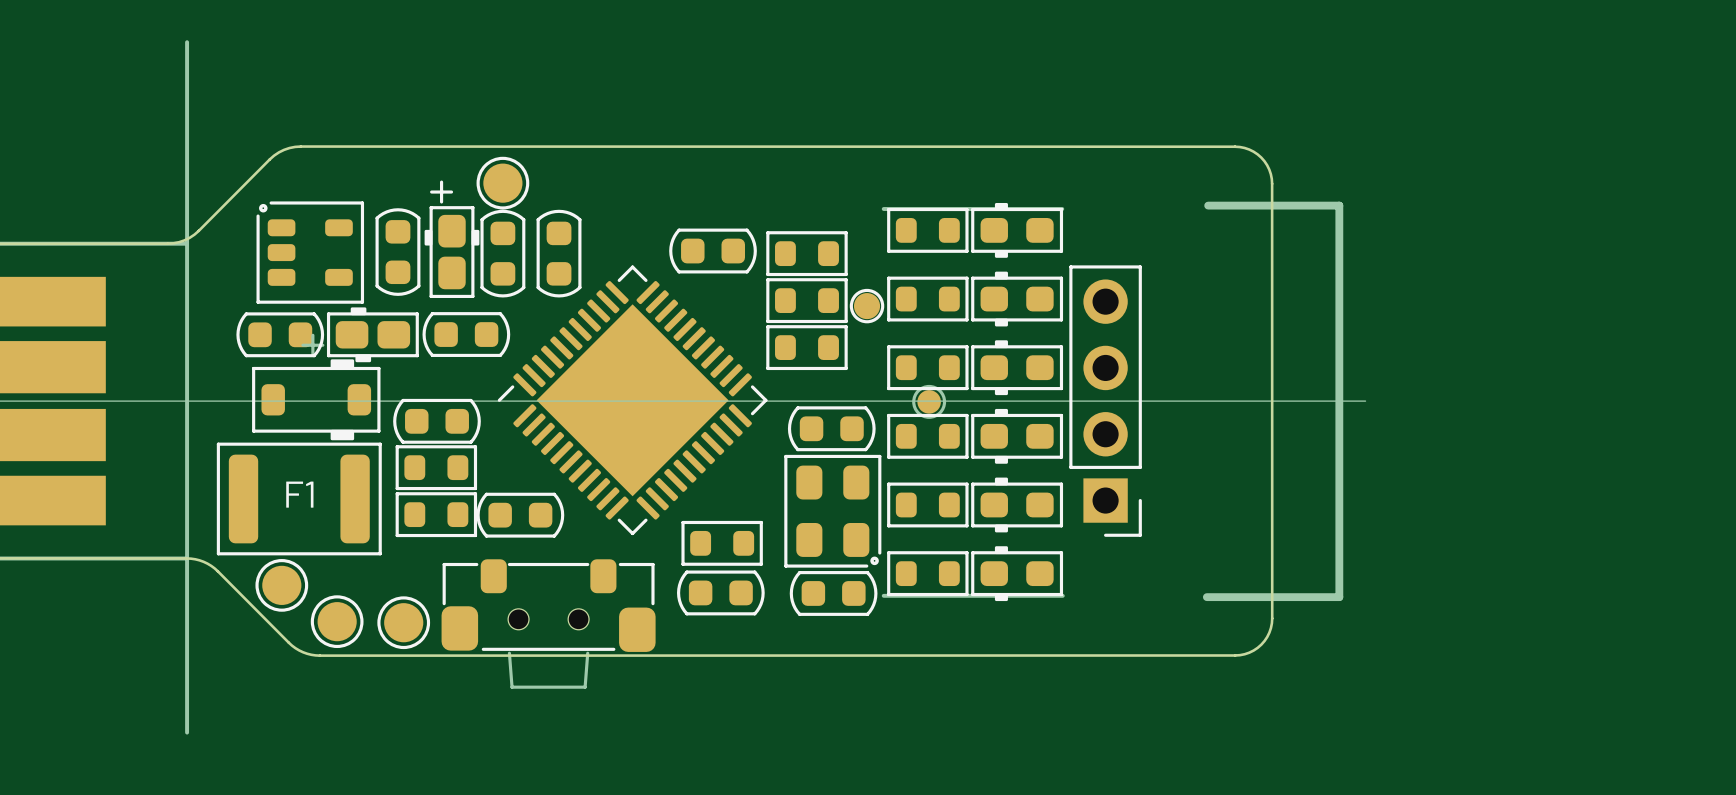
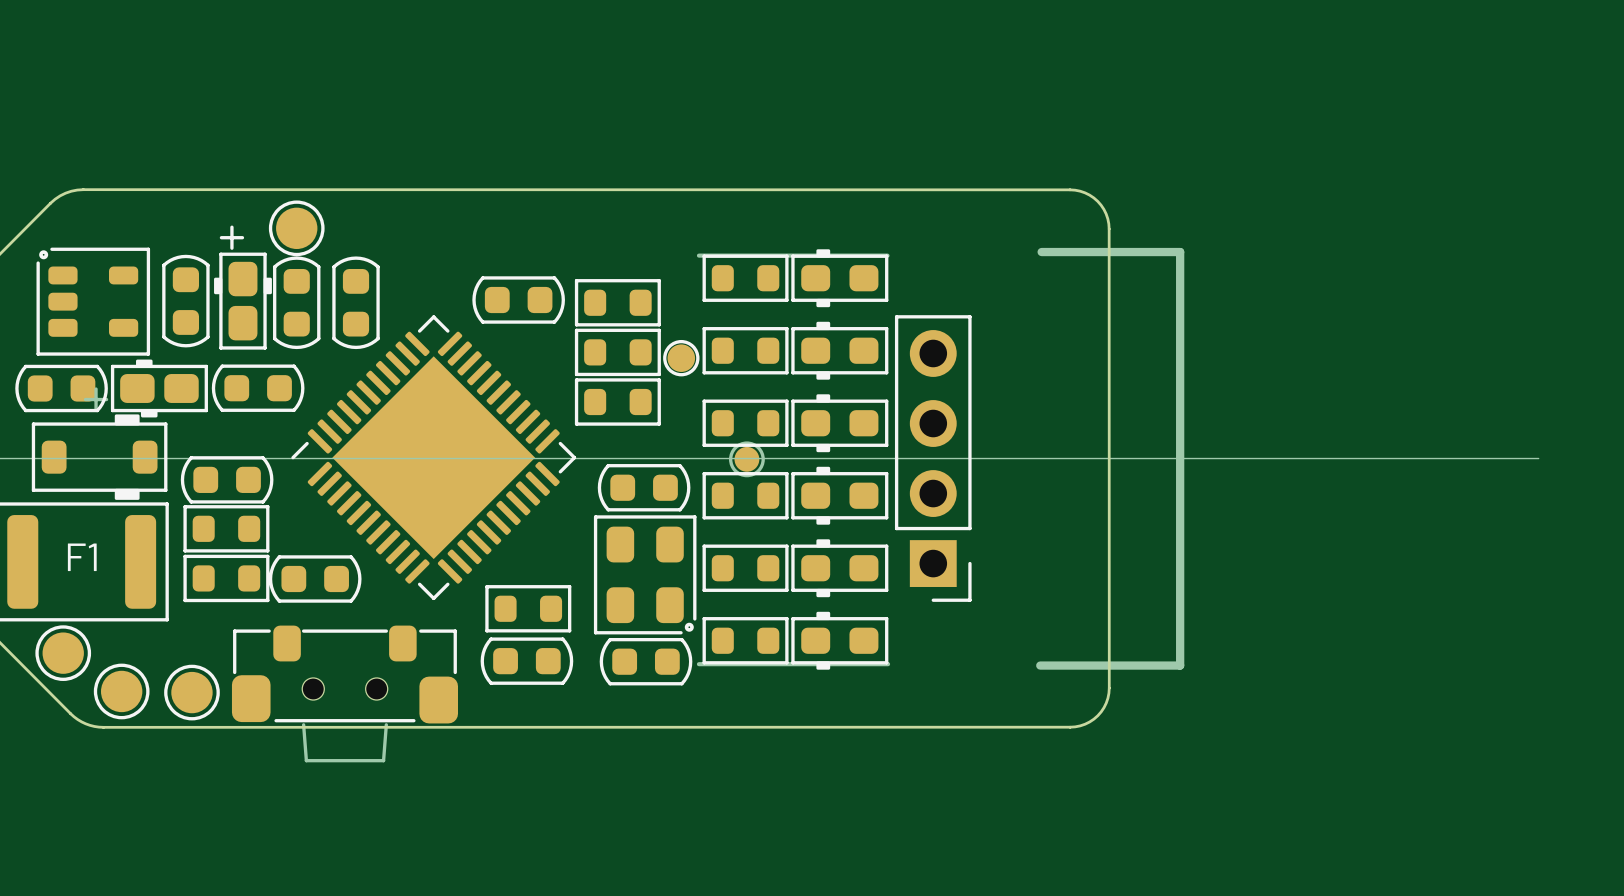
line: none -> (1207, 458) (1538, 458)

